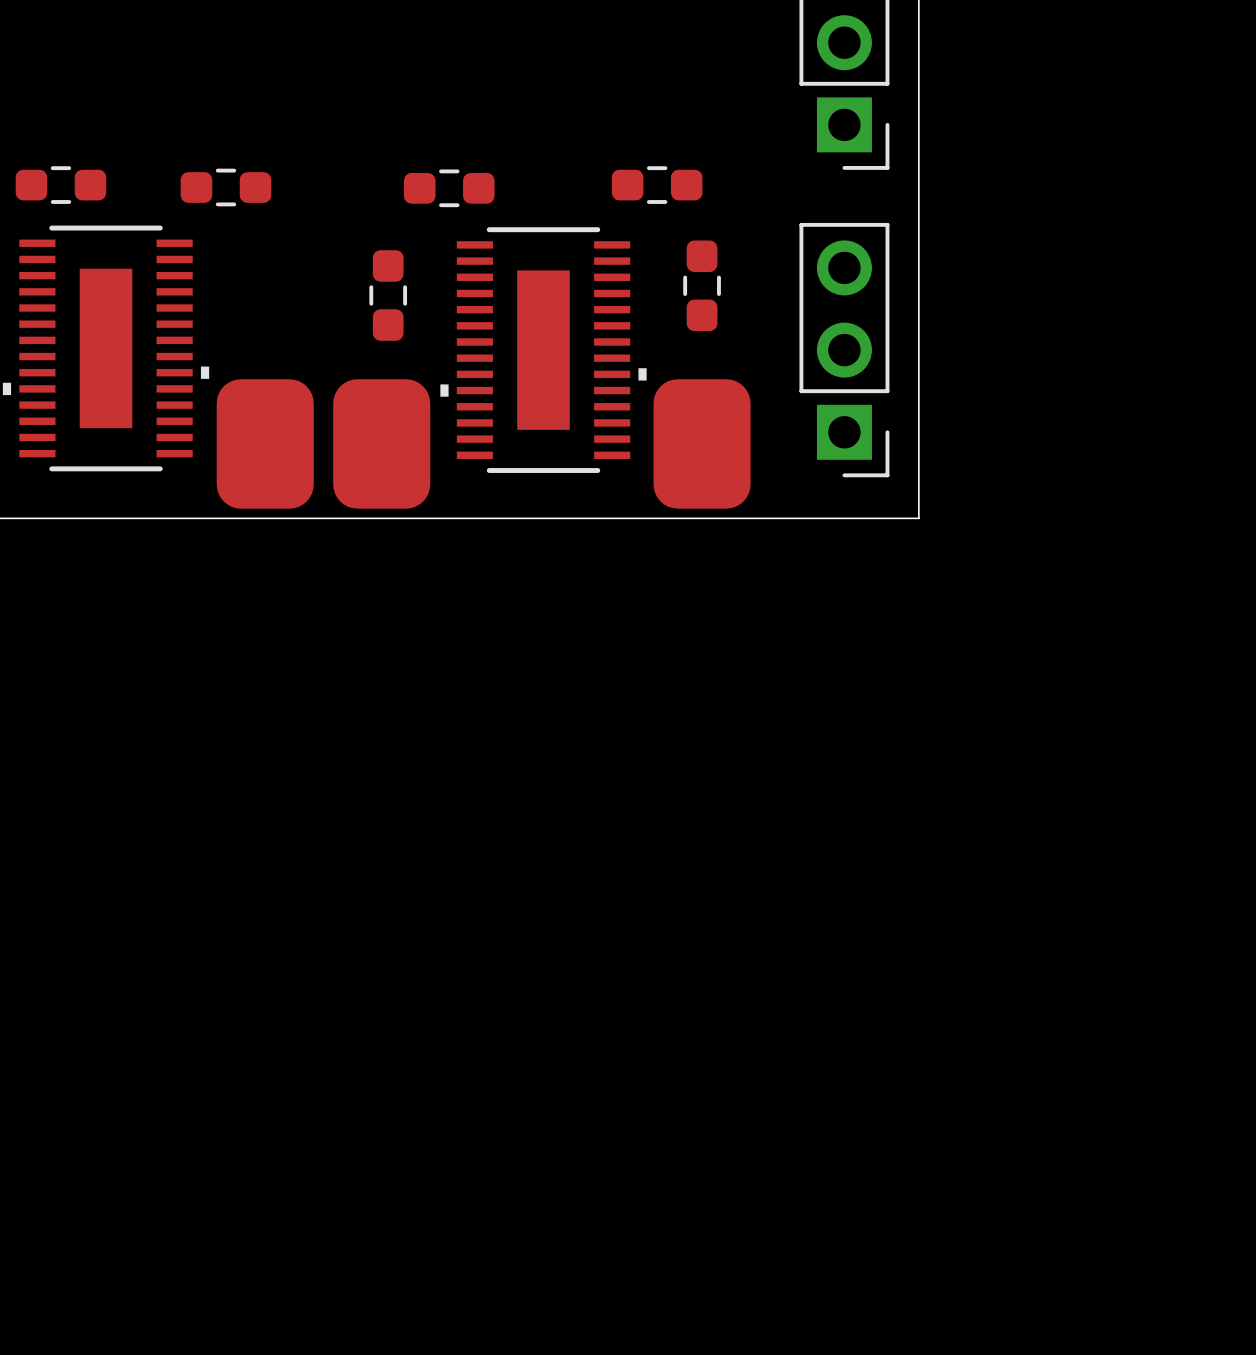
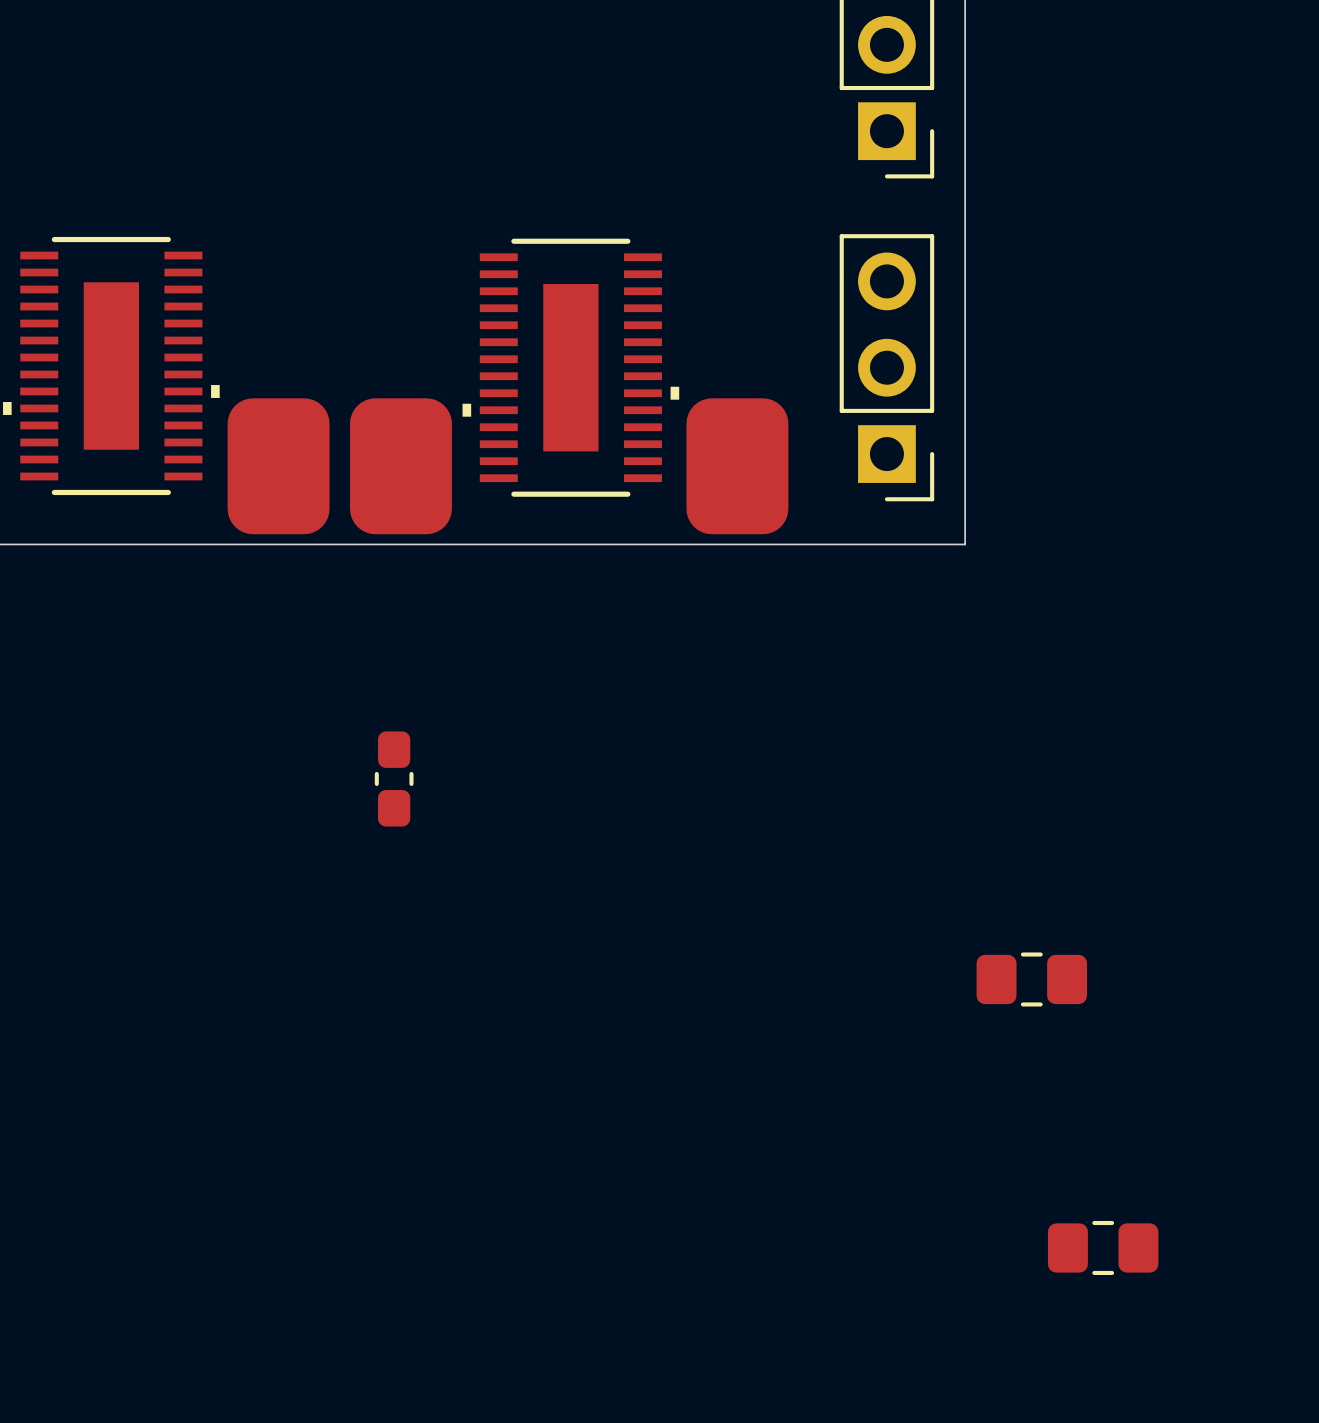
part: (60, 185) -> none
part: (657, 185) -> none
part: (226, 187) -> none
part: (449, 188) -> none
part: (702, 285) -> none
part: (388, 295) -> none
part: none -> (394, 778)
part: none -> (1031, 979)
part: none -> (1103, 1247)

